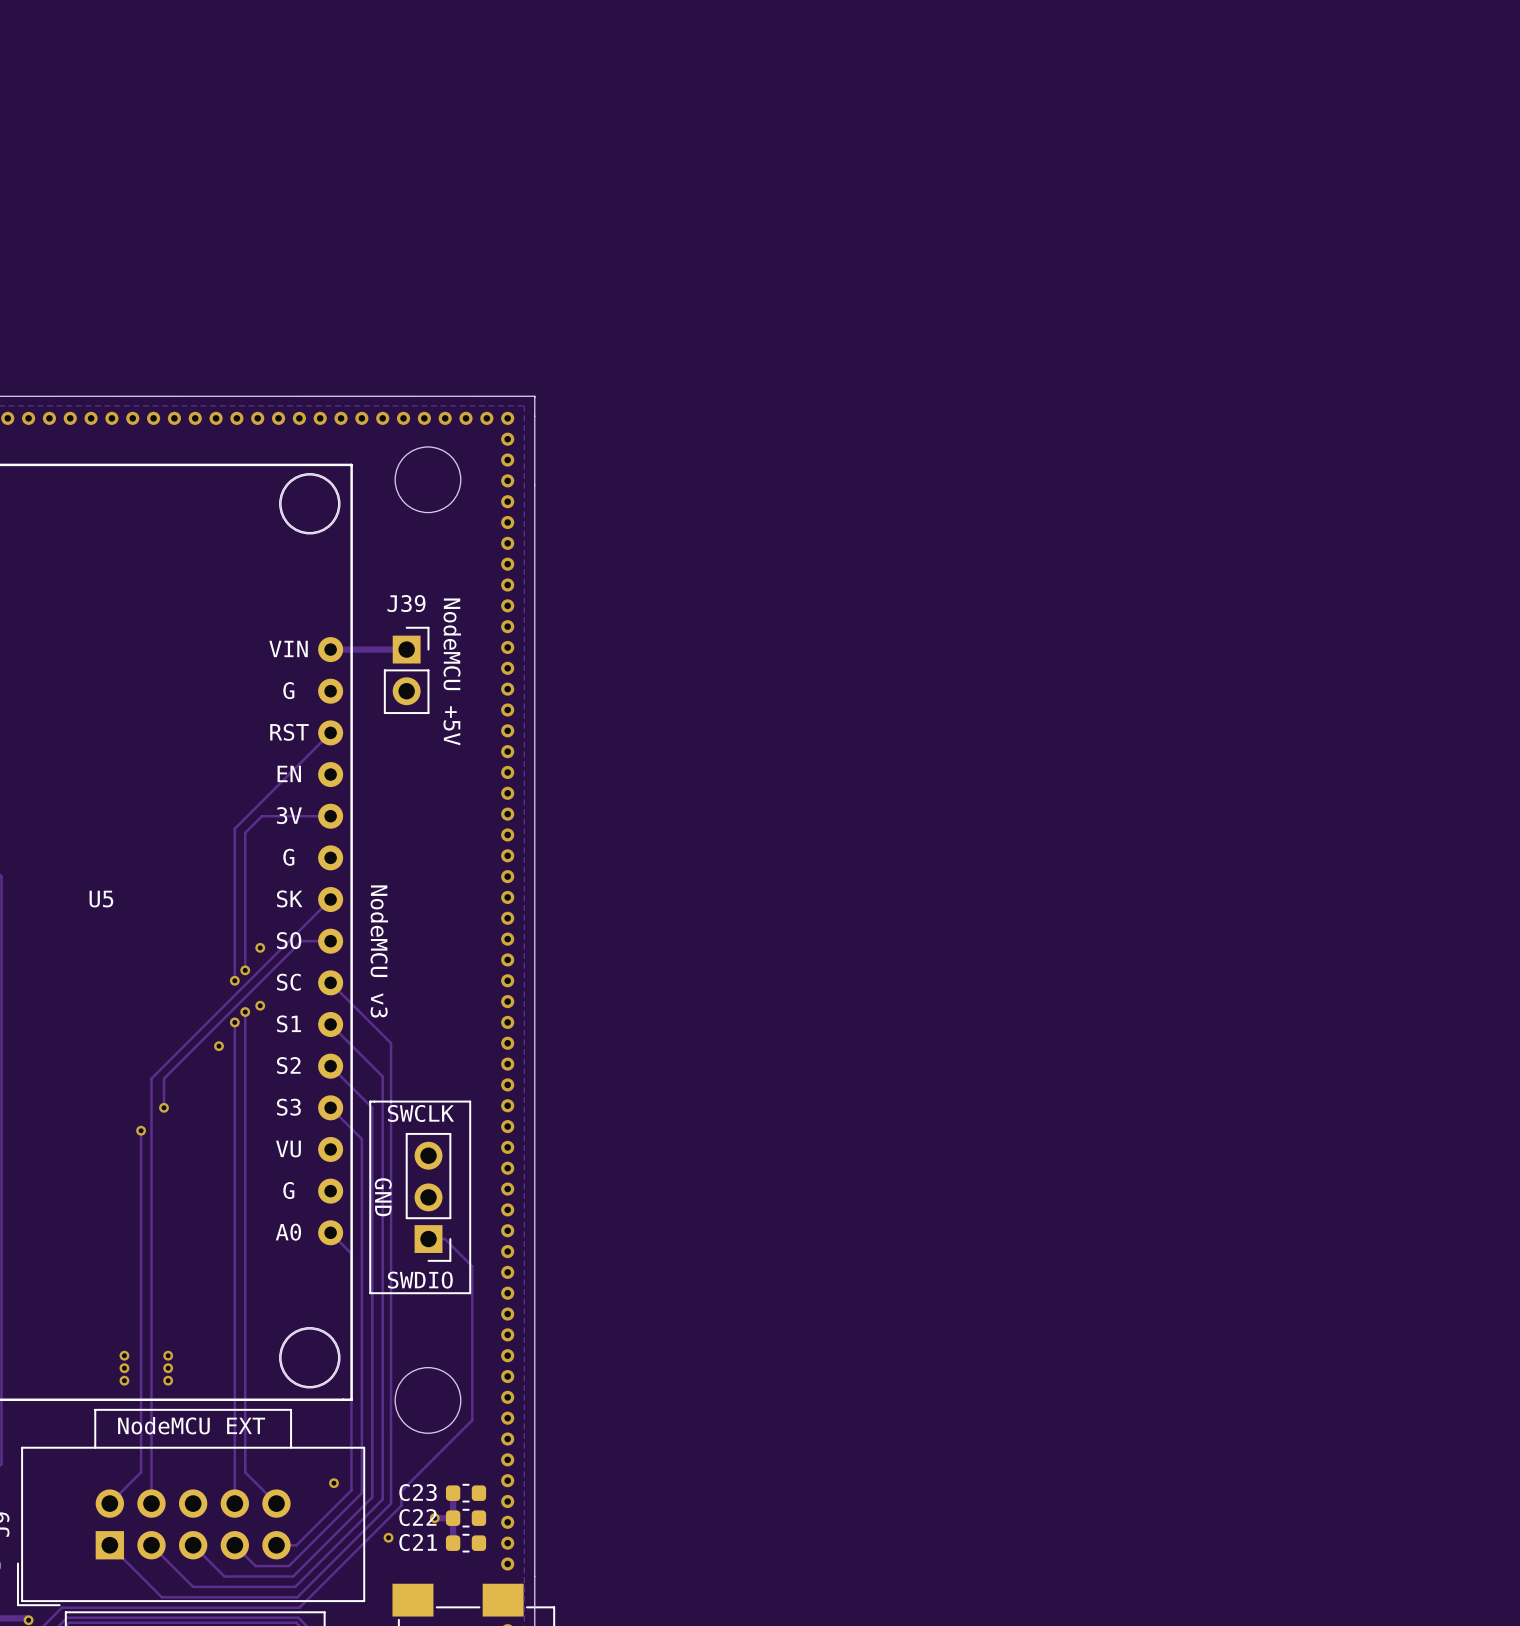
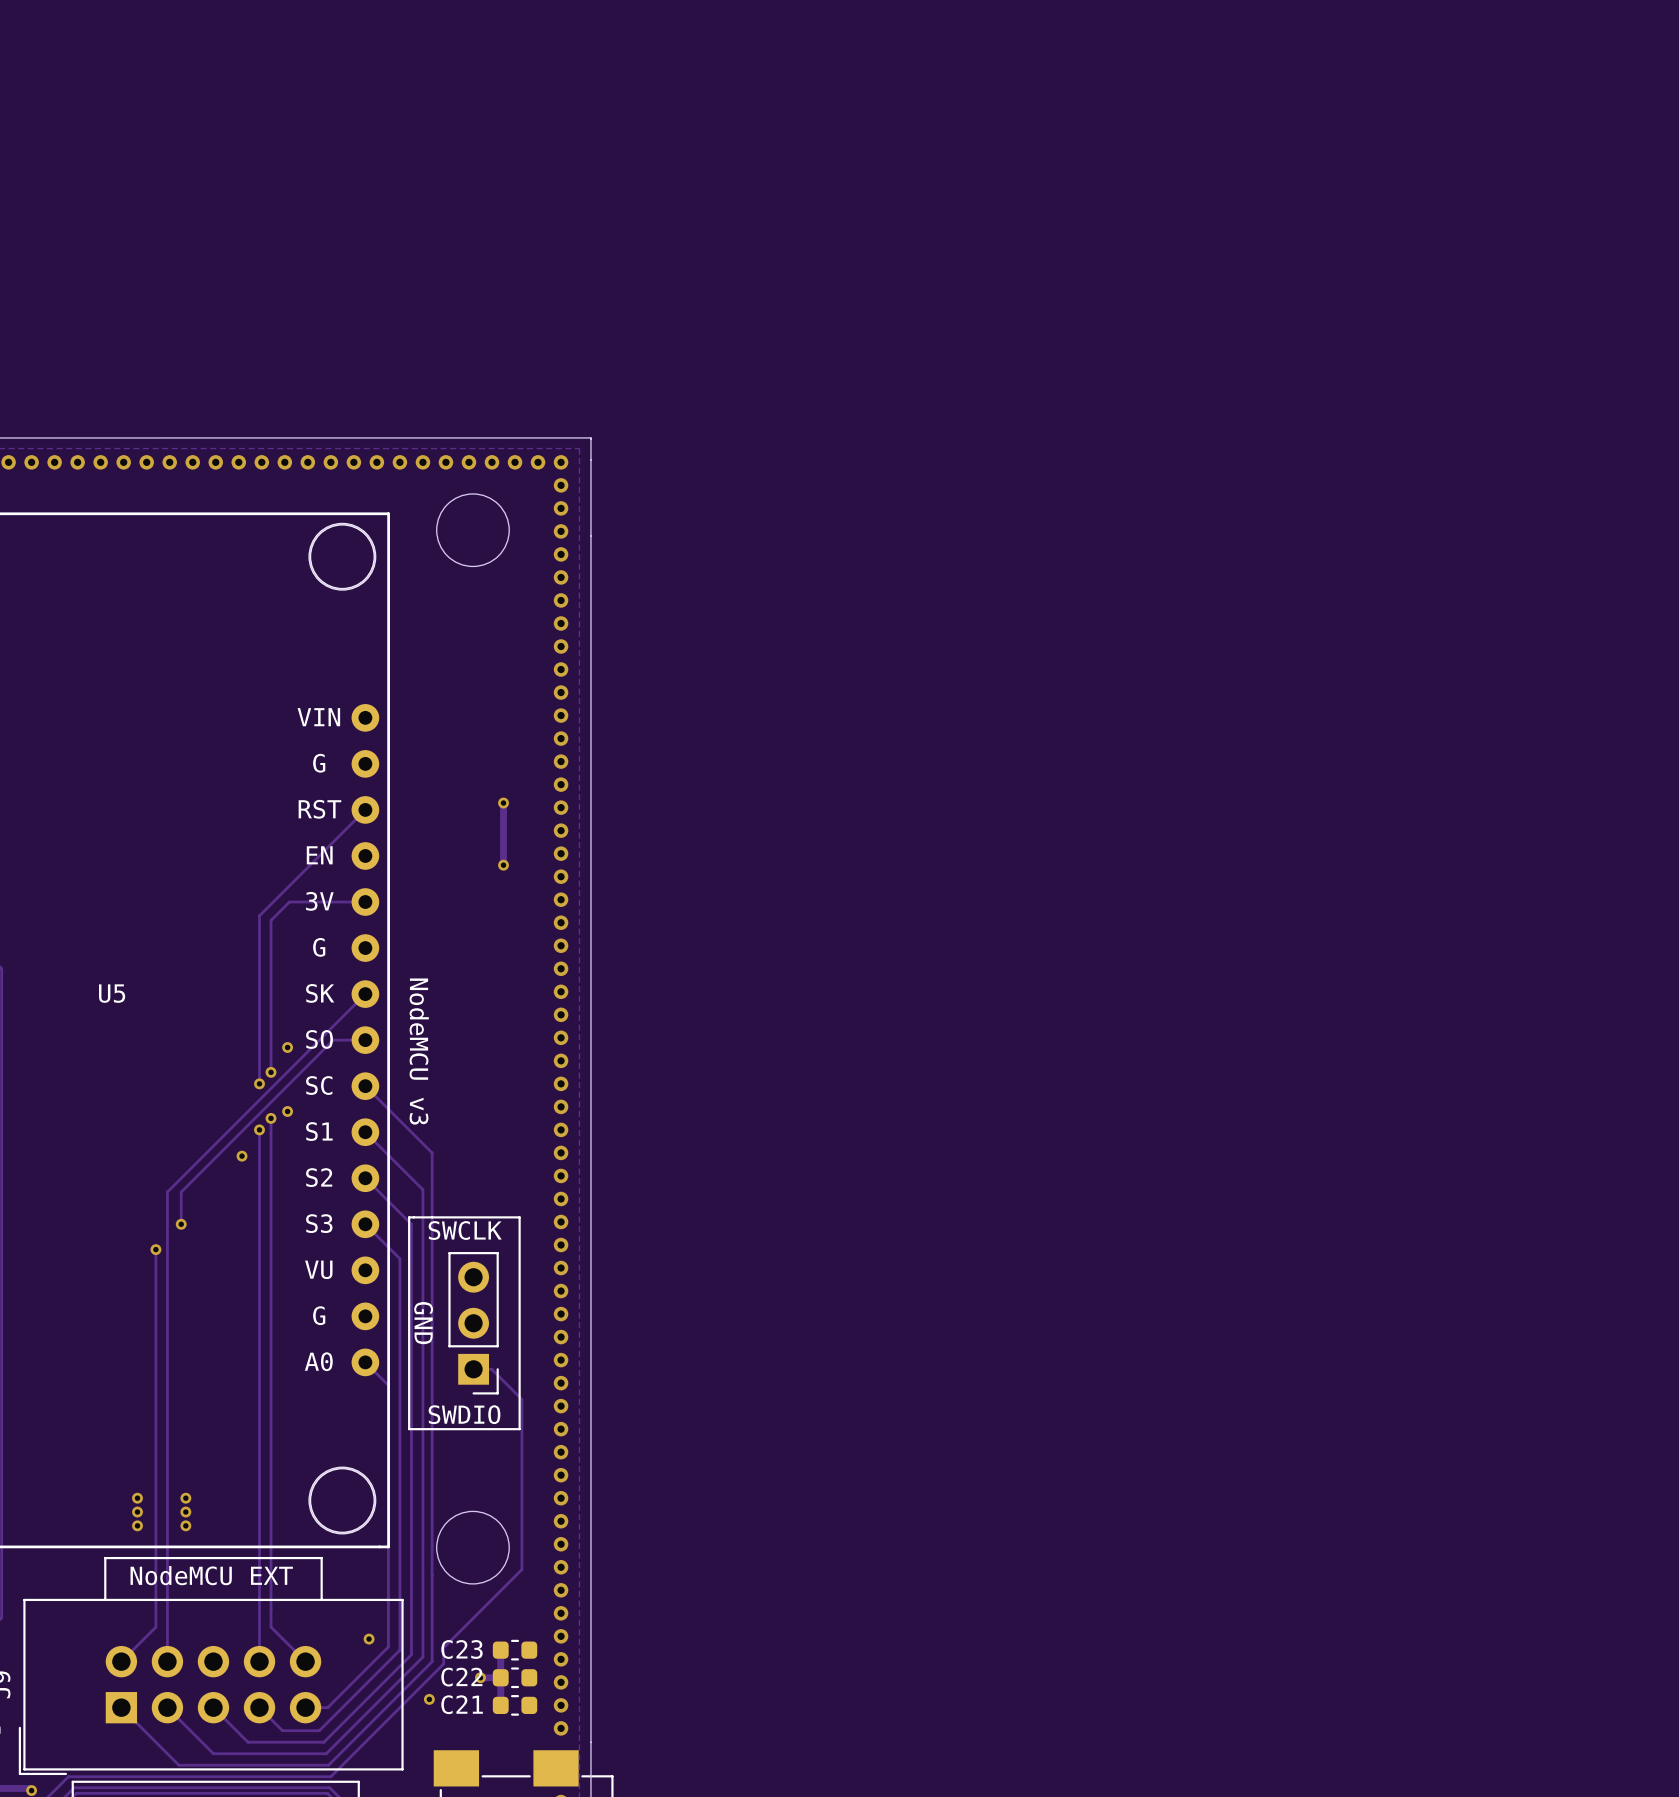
track: (330, 649) (406, 649) -> none
J39: (406, 670) -> none
text: NodeMCU +5V (452, 671) -> none
track: none -> (503, 803) (503, 865)
via: none -> (503, 803)
via: none -> (503, 865)

